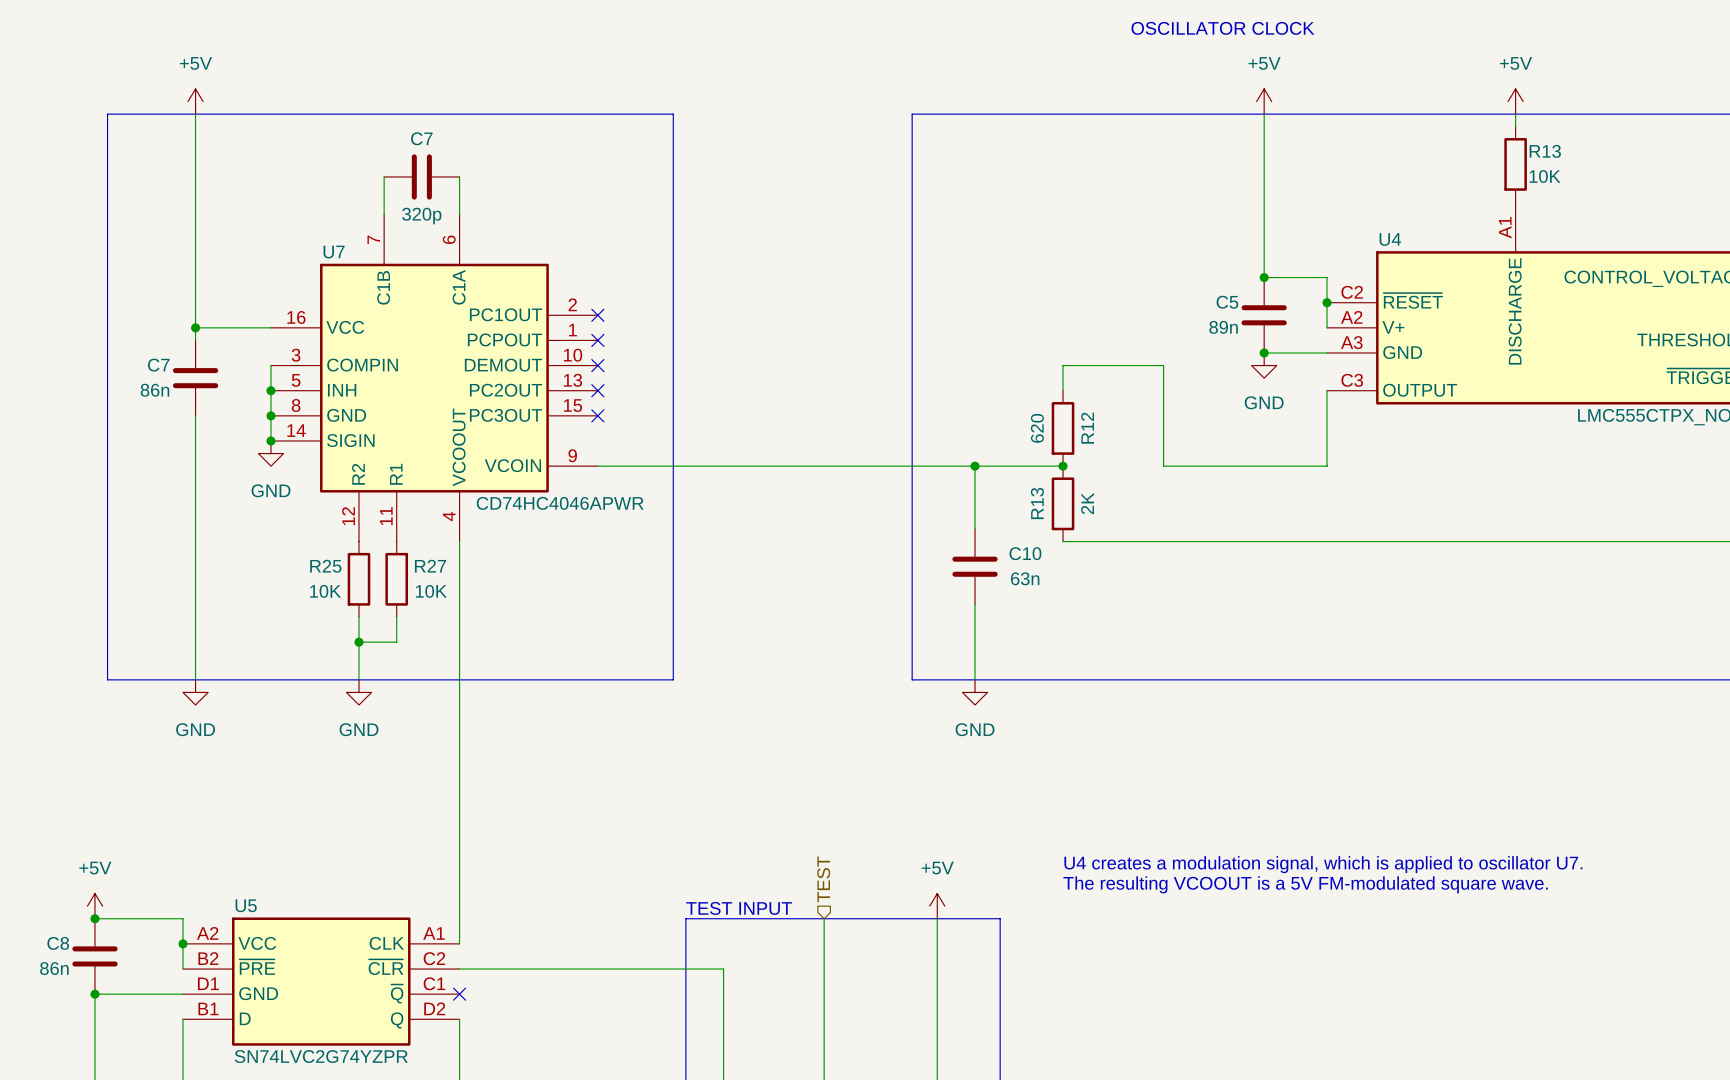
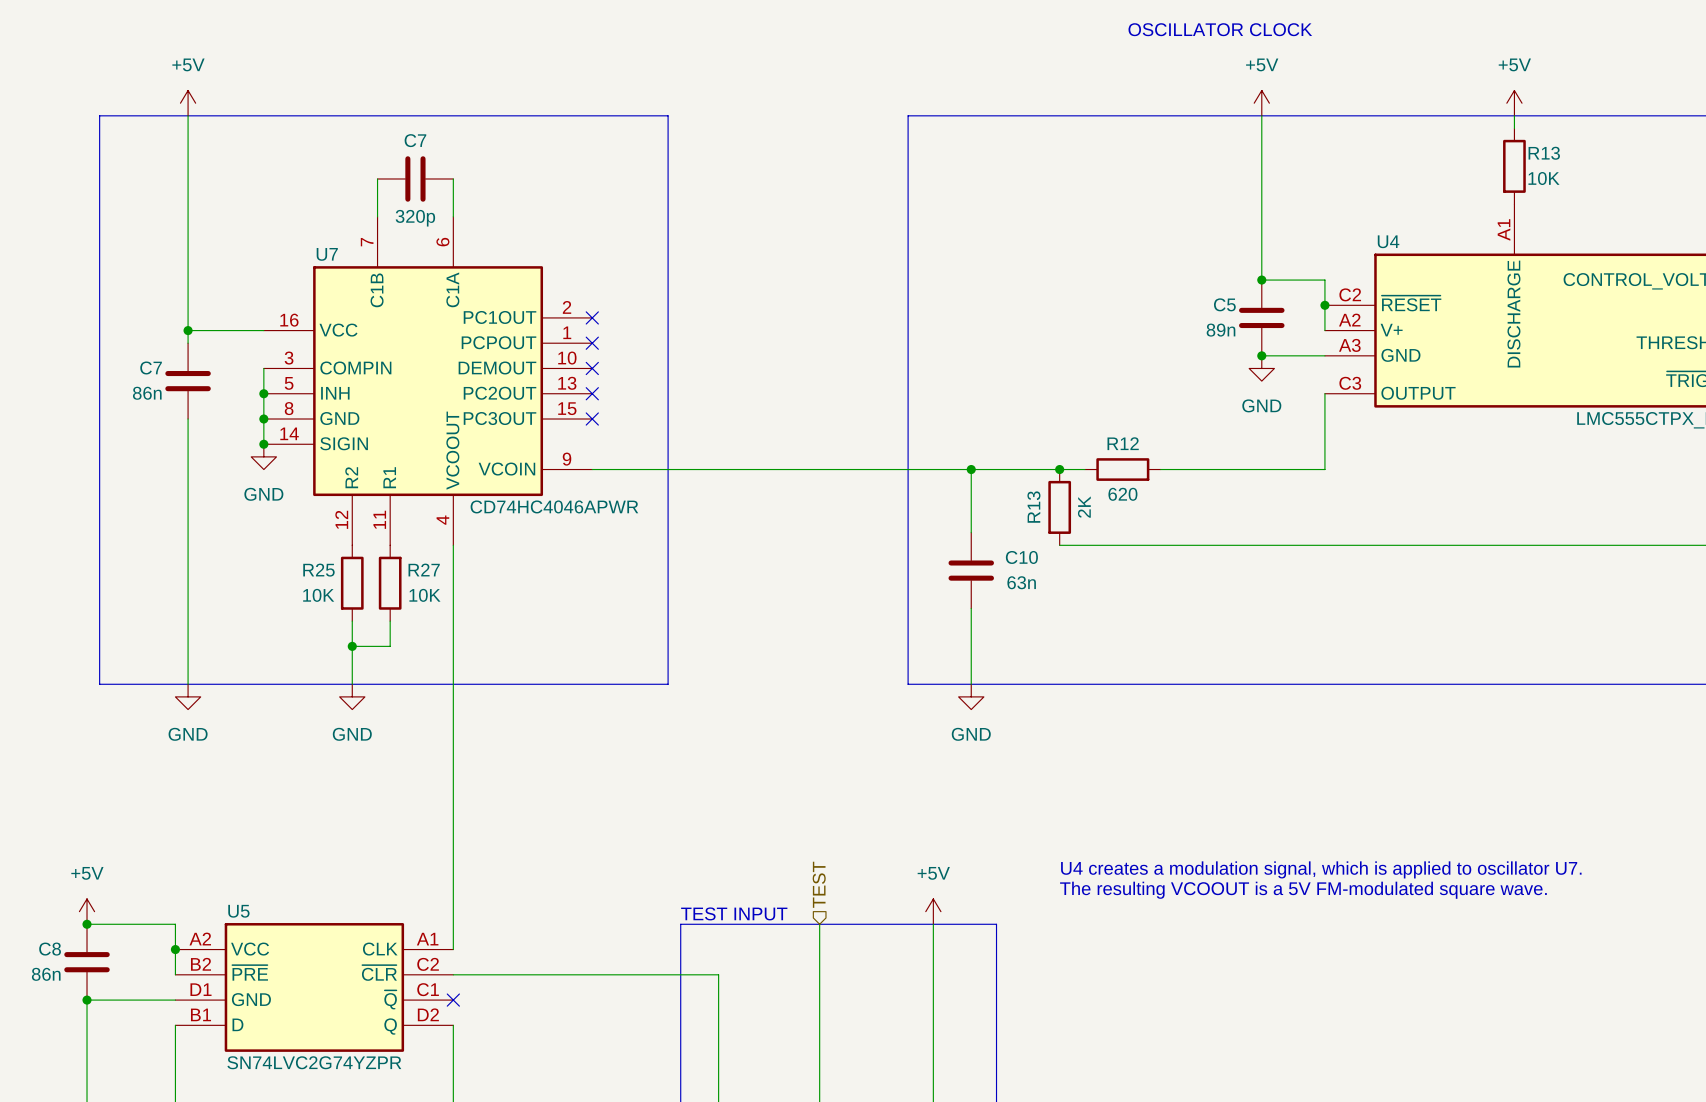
wire: (1063, 390) (1063, 365) (1163, 365) (1163, 466) -> none
R12 value position: 620 (1037, 428) -> 620 (1122, 494)
R12 rotation: 0° (1063, 428) -> 90° clockwise (1122, 469)
R12 position: (1063, 428) -> (1122, 469)
R12 name position: R12 (1087, 428) -> R12 (1123, 443)
wire: none -> (1059, 469) (1084, 469)

